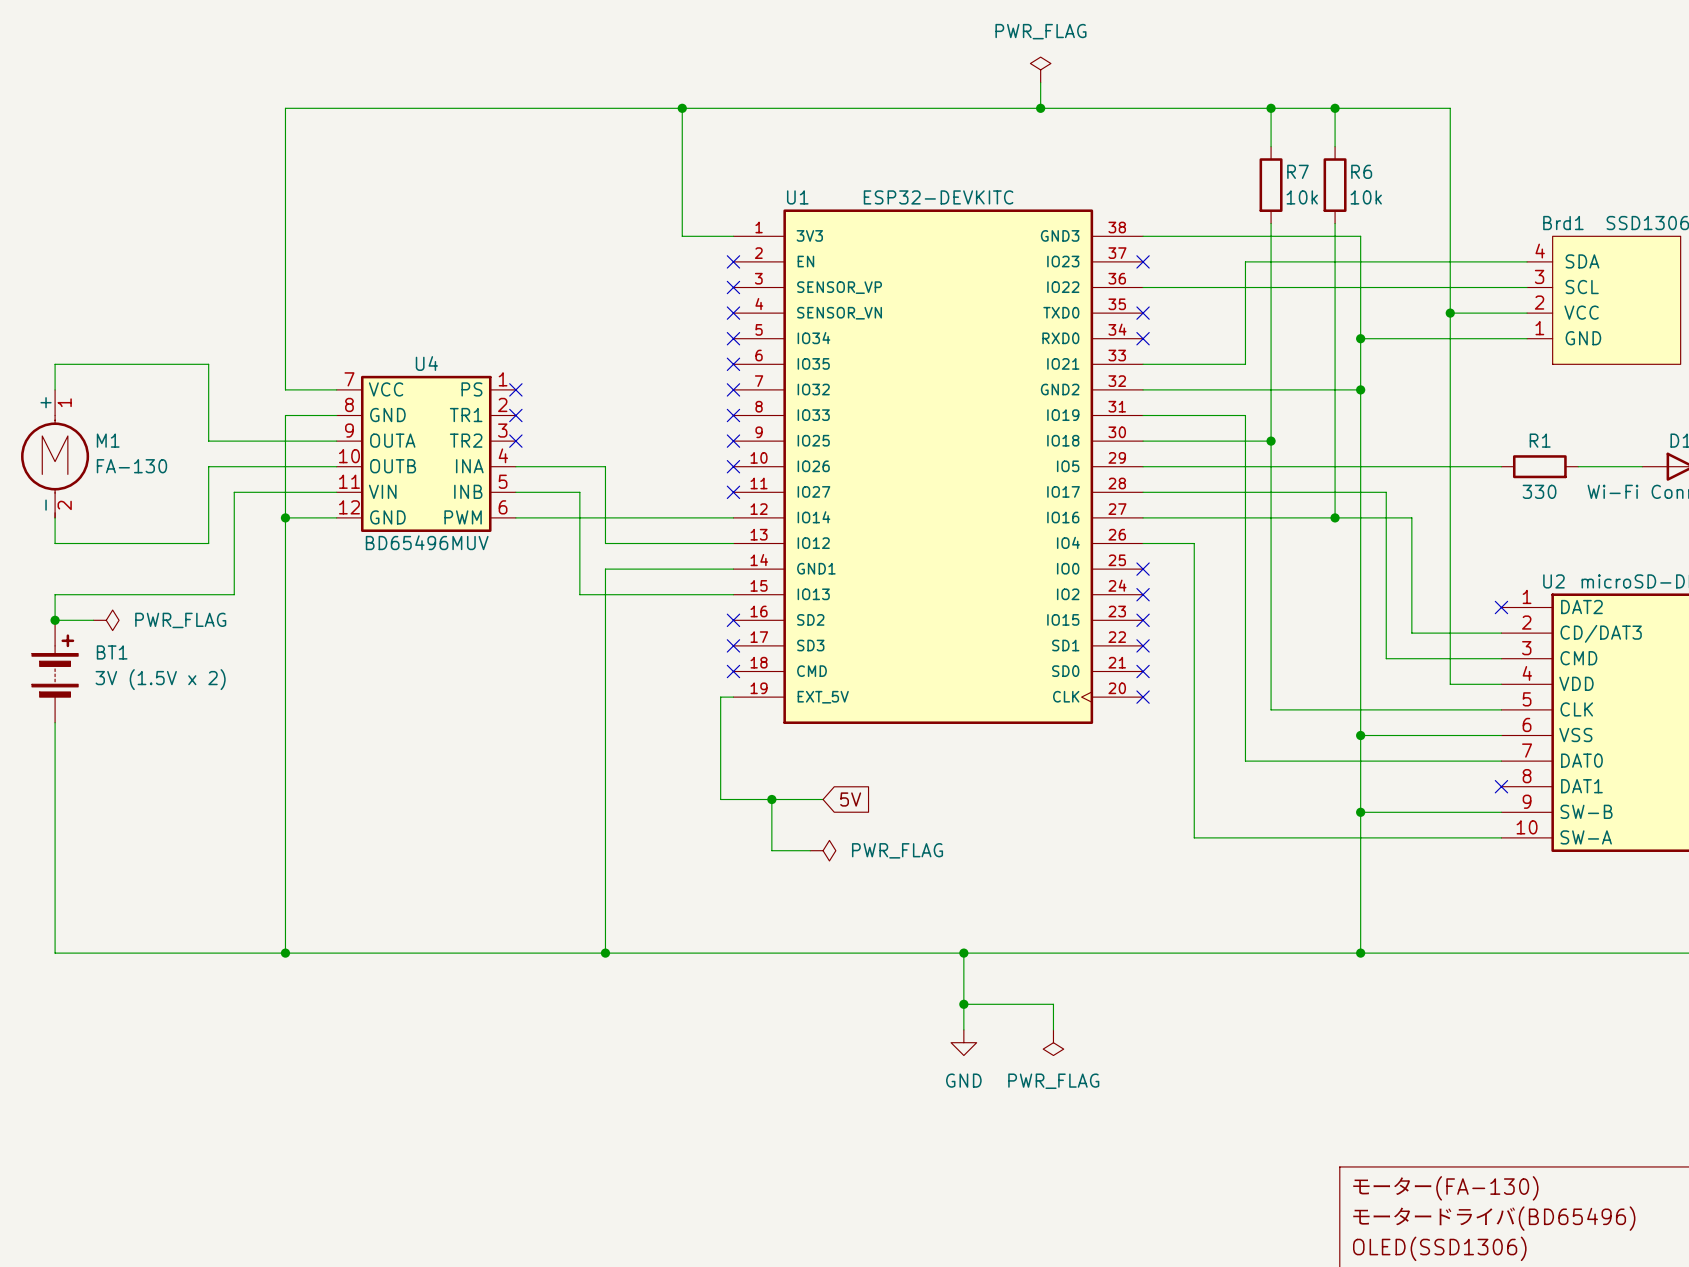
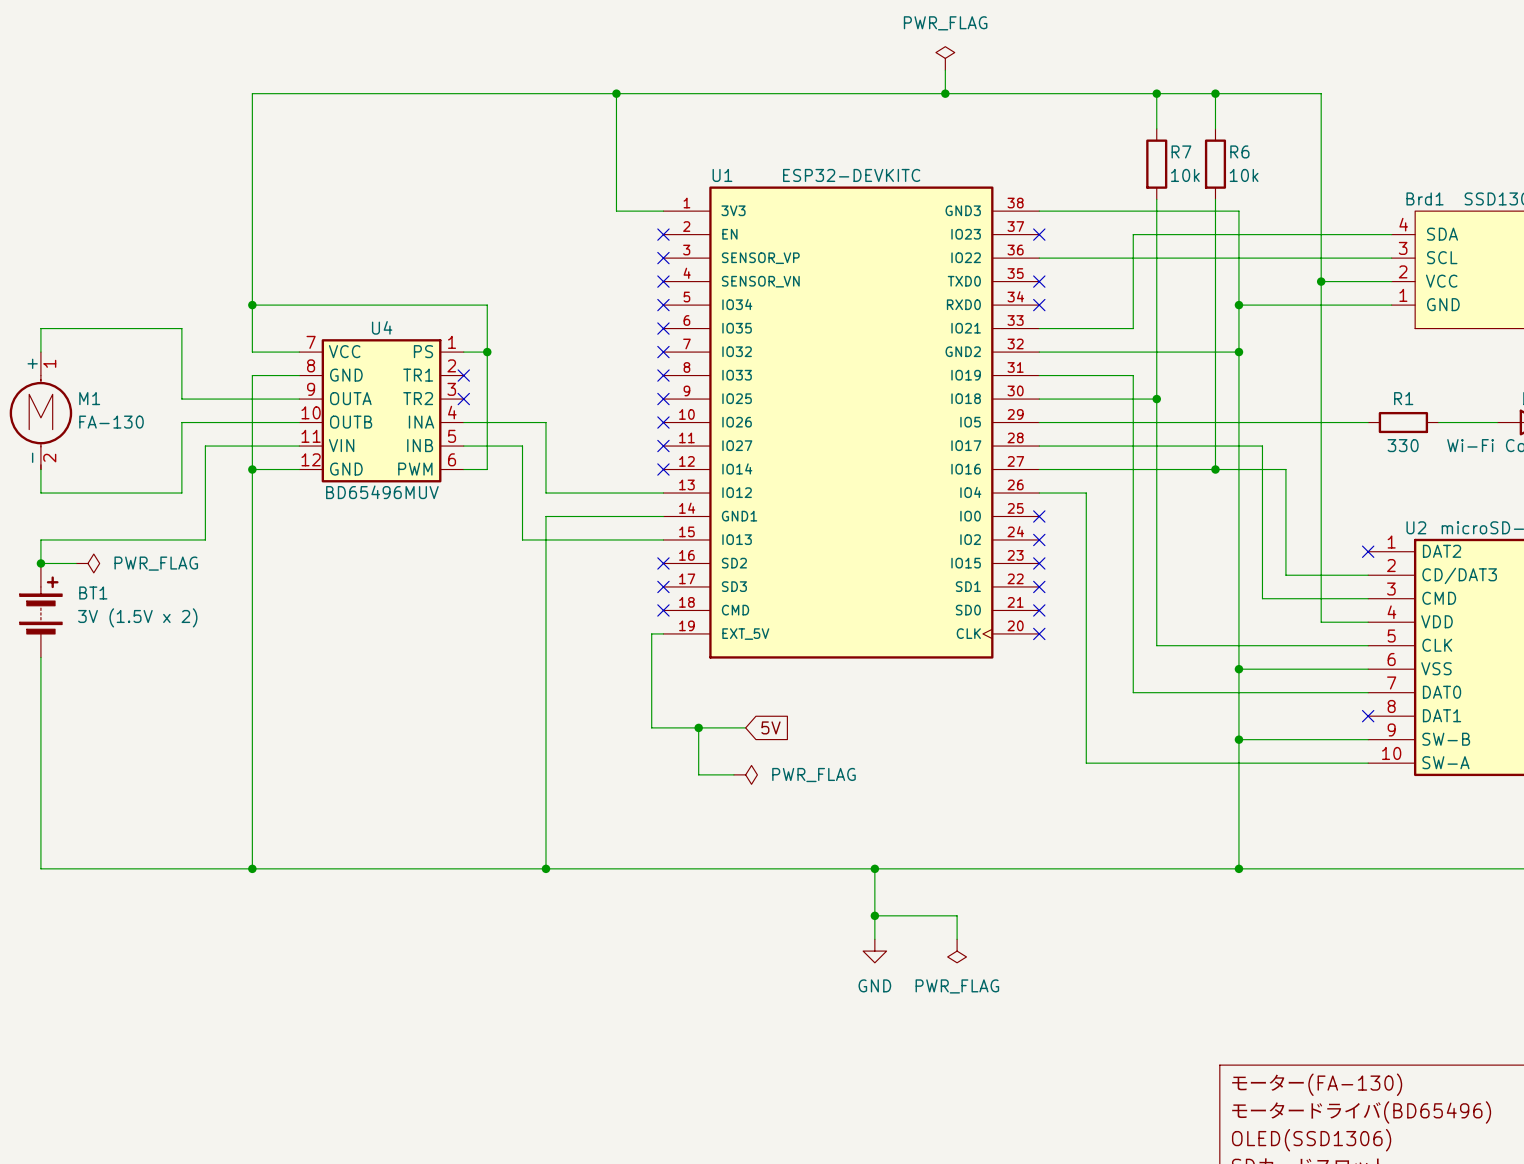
junction: none -> (252, 305)
wire: none -> (463, 352) (487, 352)
no-connect mark: (515, 389) -> none
junction: none -> (487, 352)
wire: (541, 517) (733, 517) -> (487, 469) (487, 305) (252, 305)
no-connect mark: none -> (663, 469)

